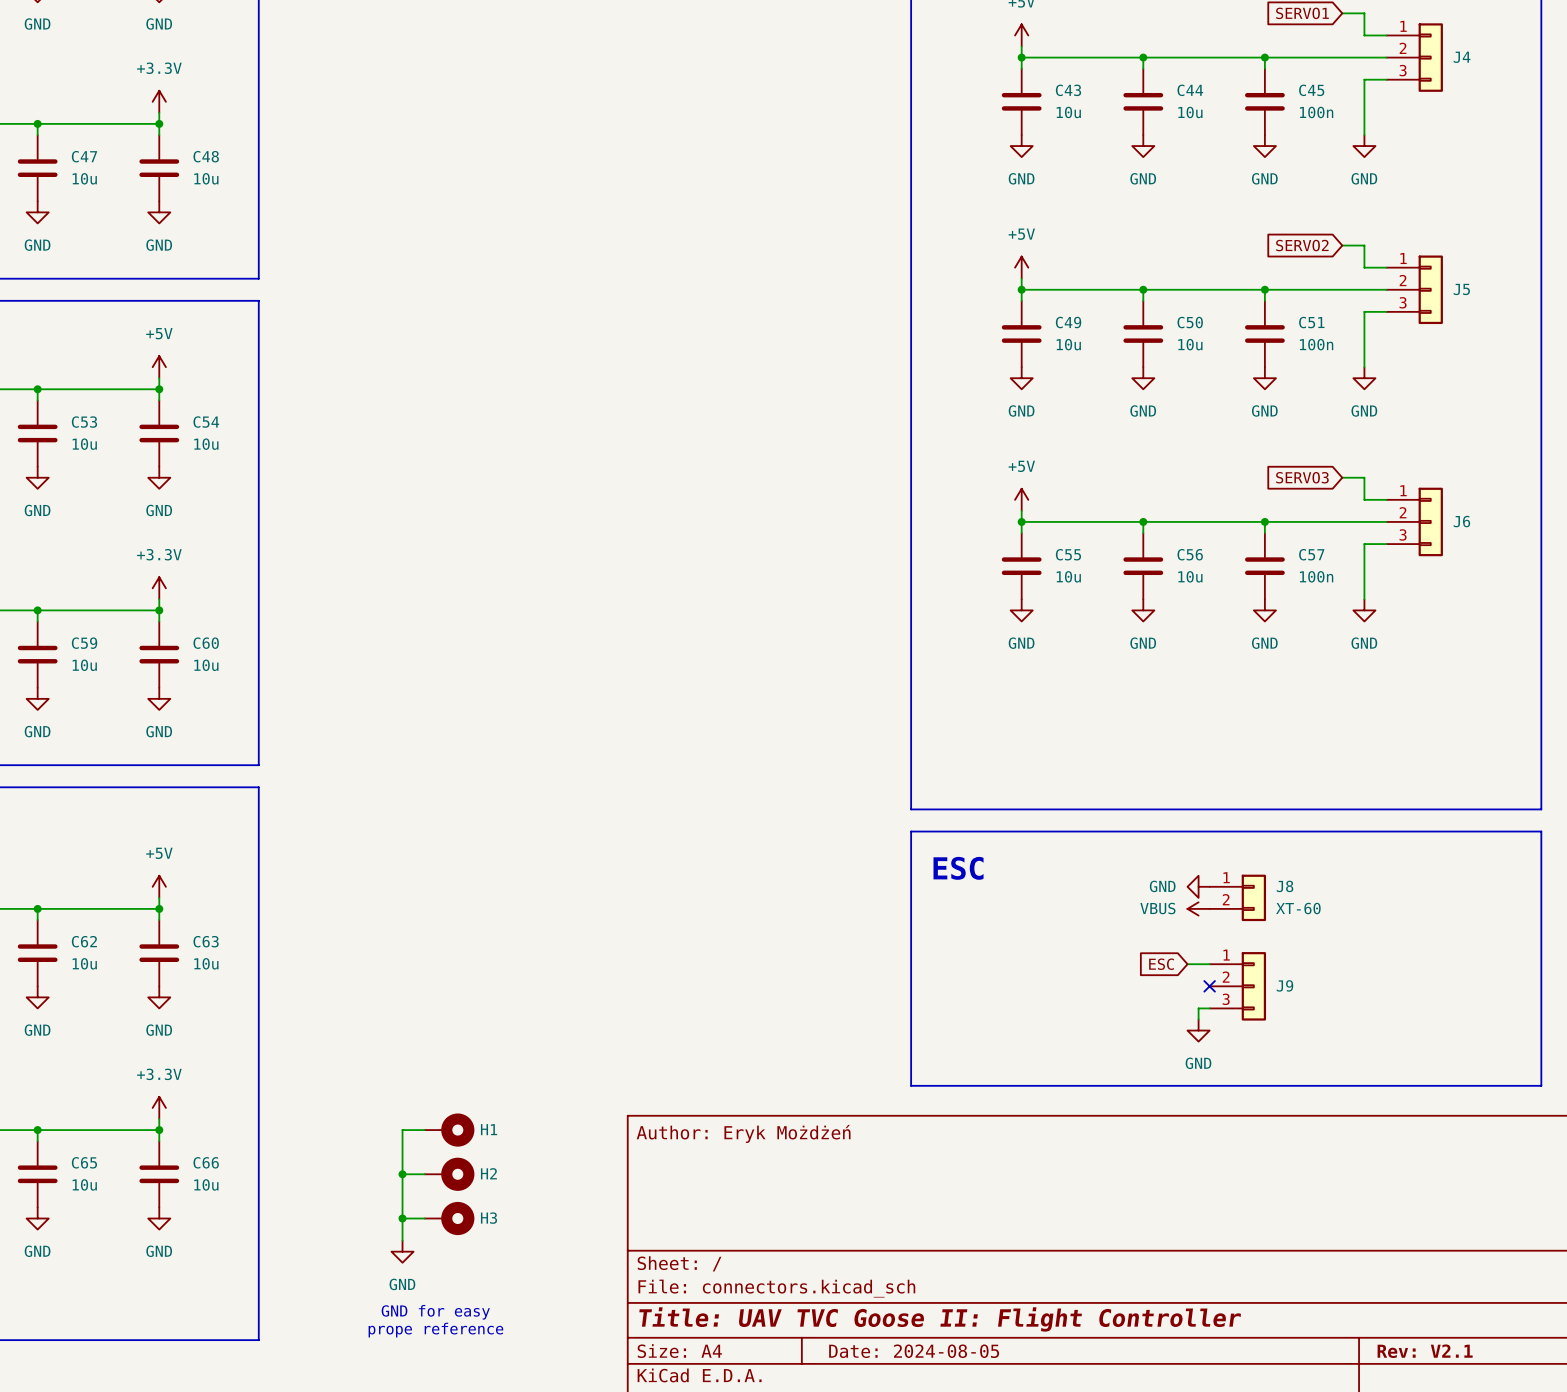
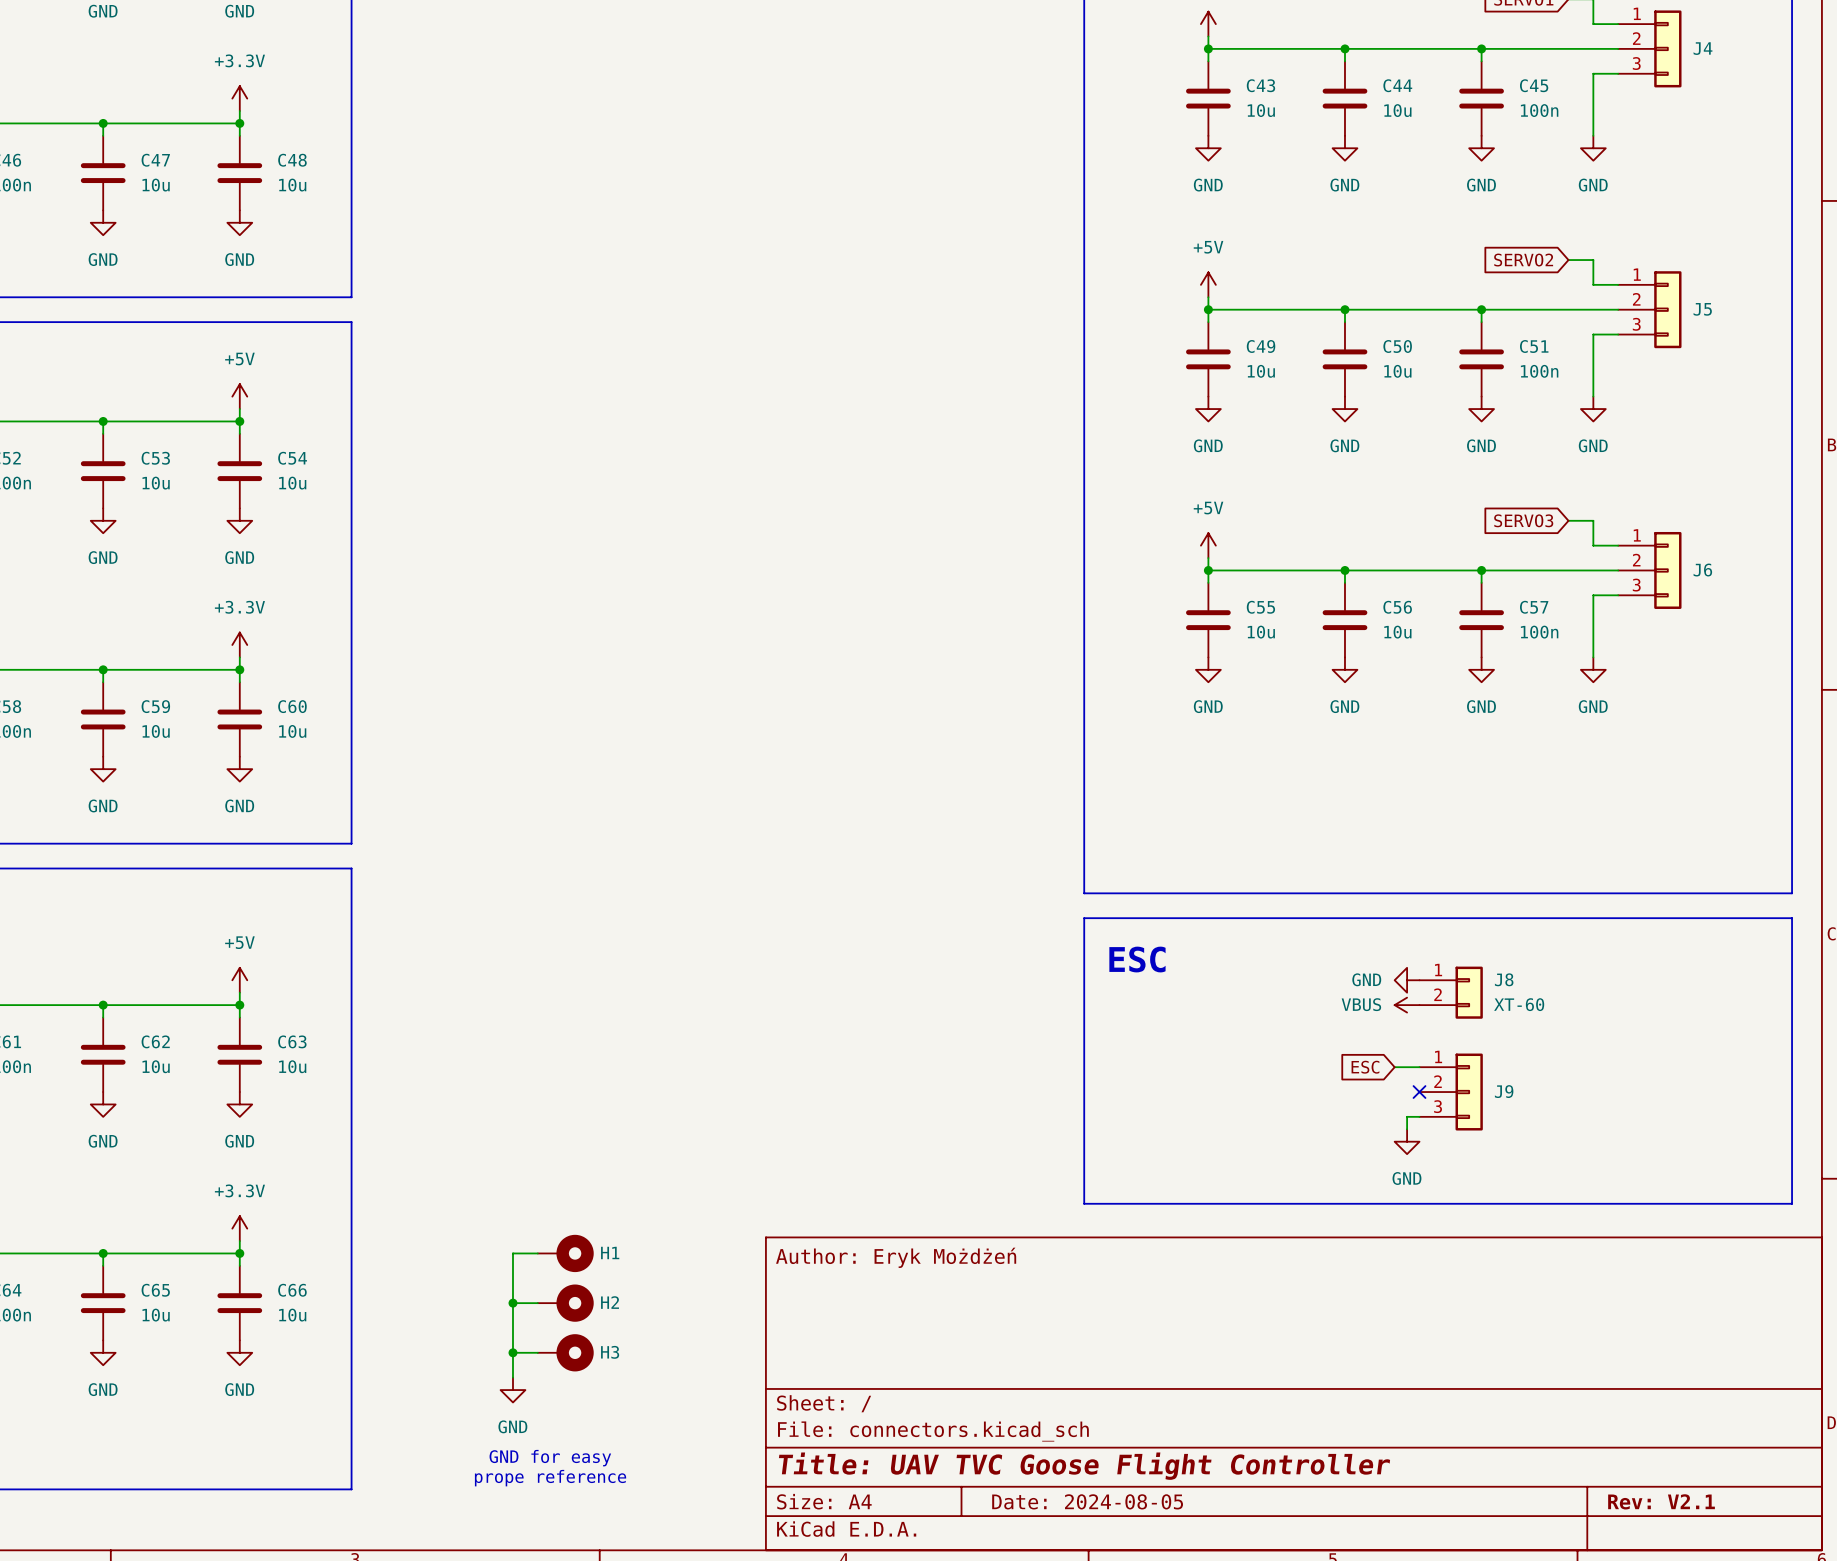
title block: Title: UAV TVC Goose II: Flight Controller (940, 1319) -> Title: UAV TVC Goose Flight Controller (1084, 1466)

